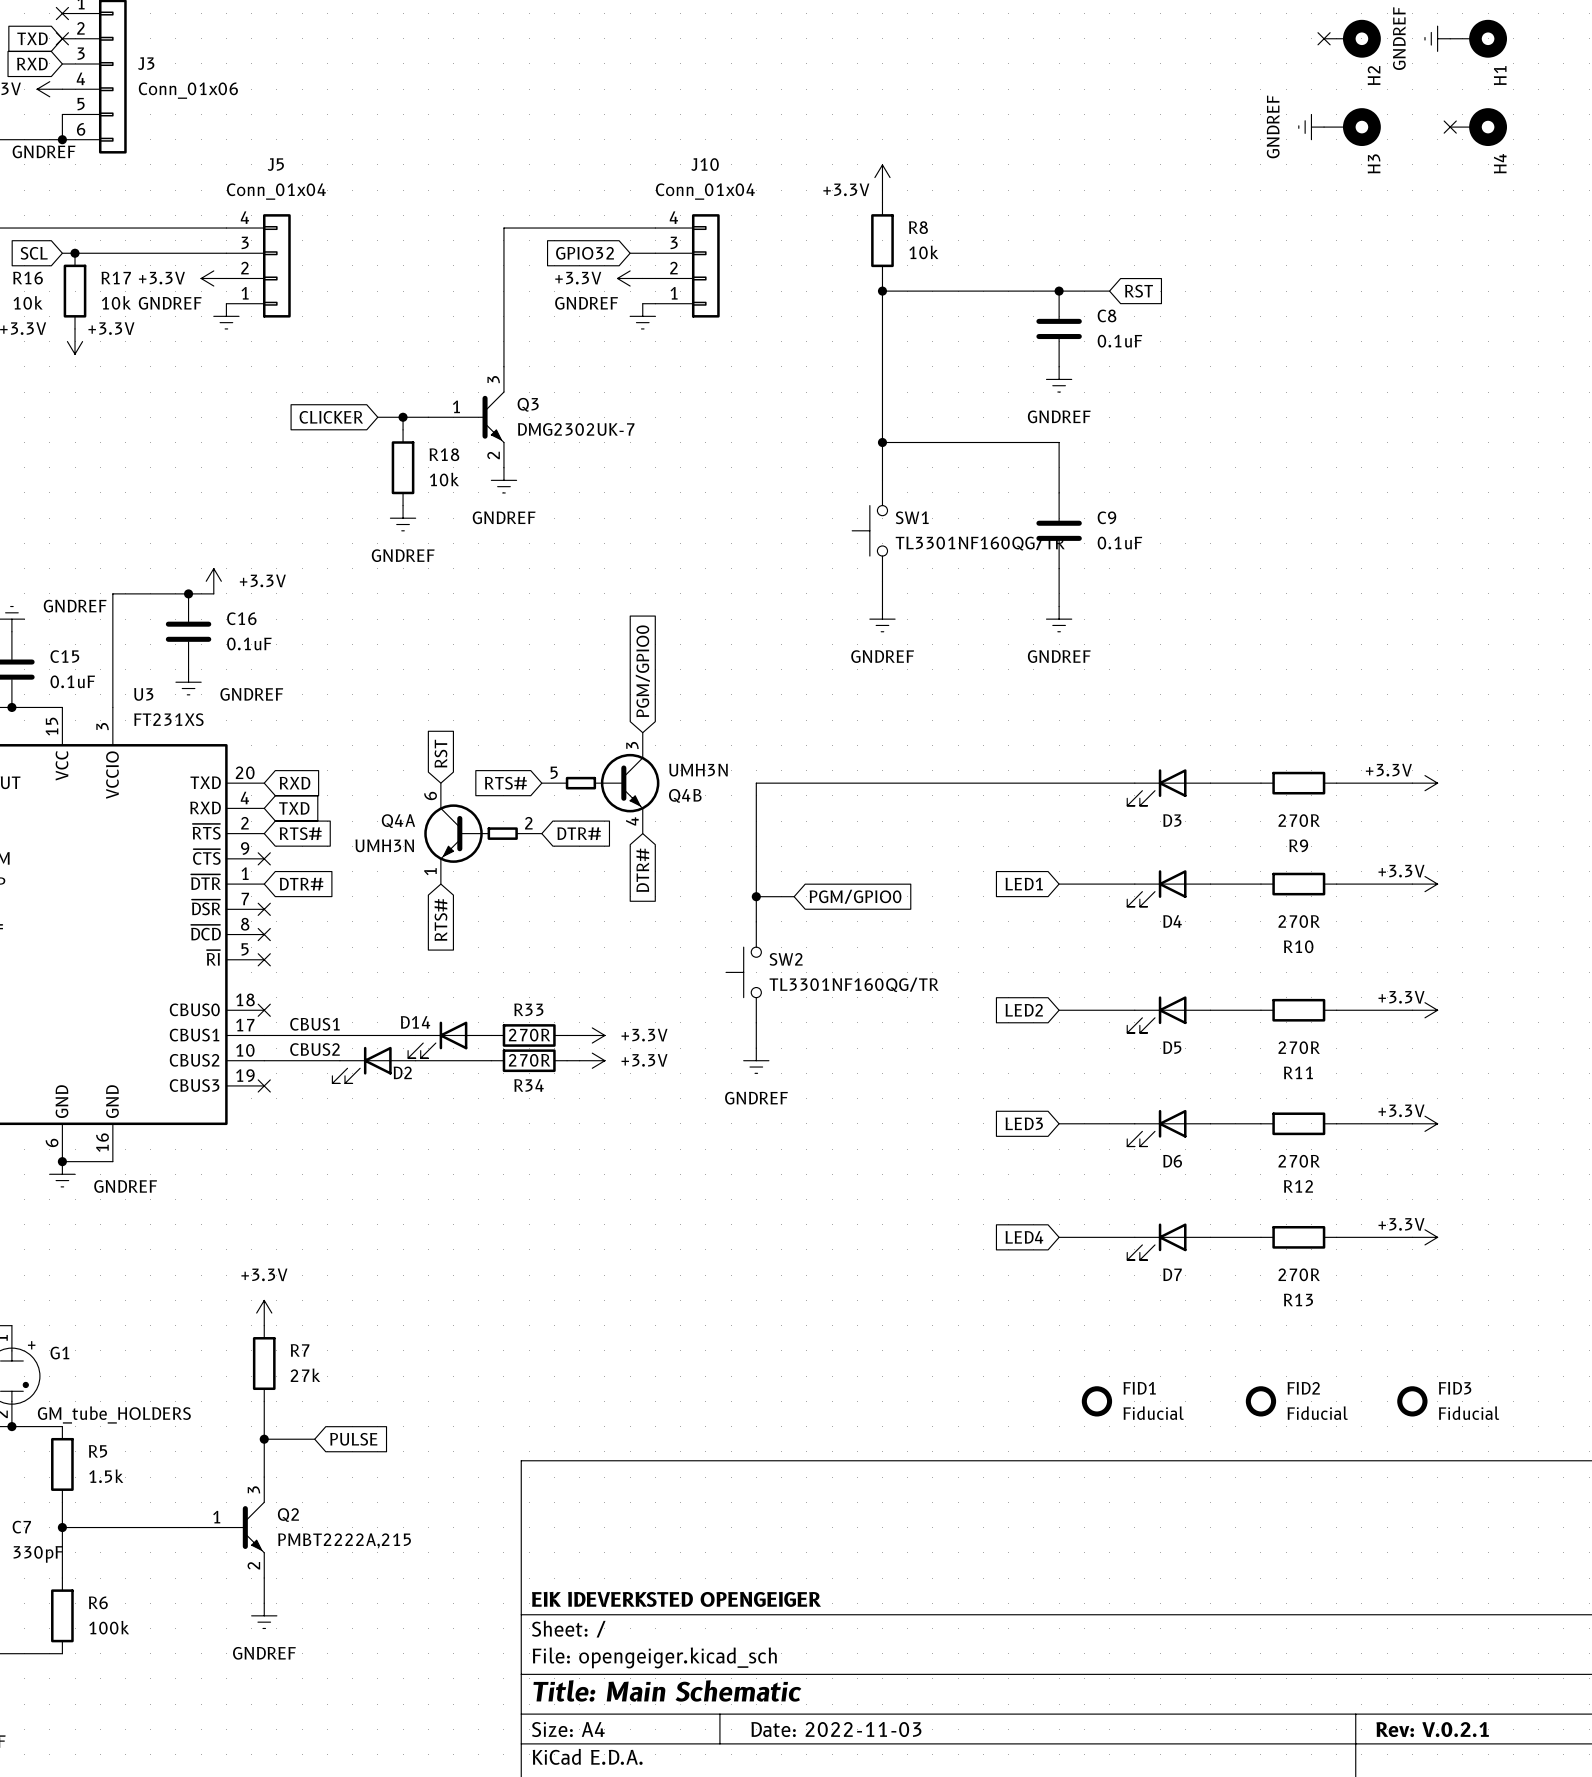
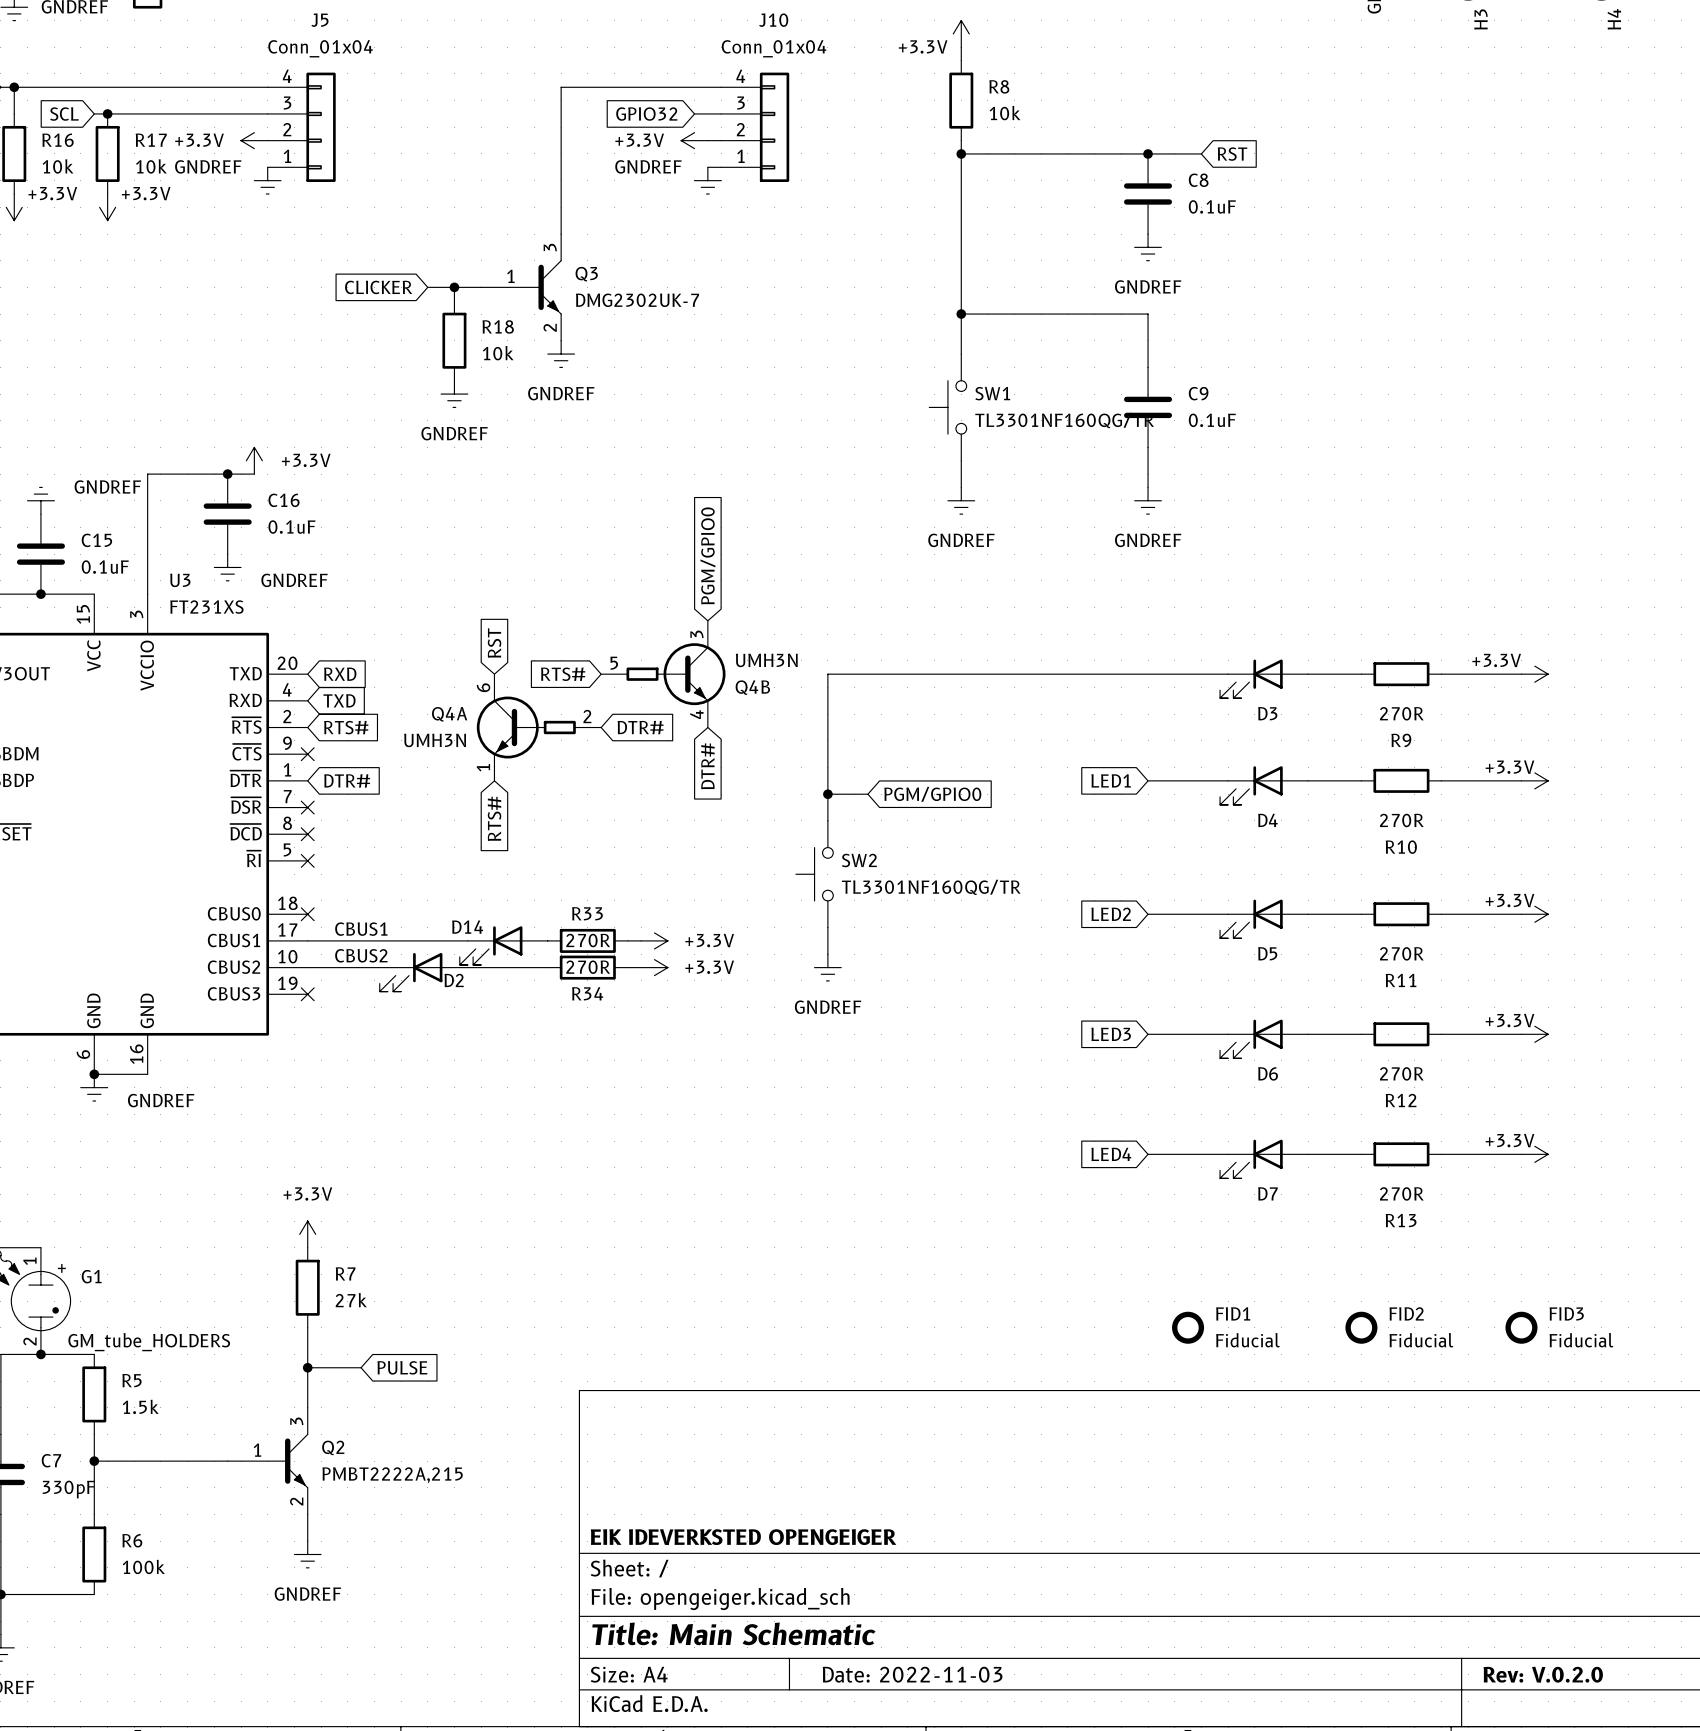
title block: Rev: V.0.2.1 (1432, 1729) -> Rev: V.0.2.0 (1543, 1674)

